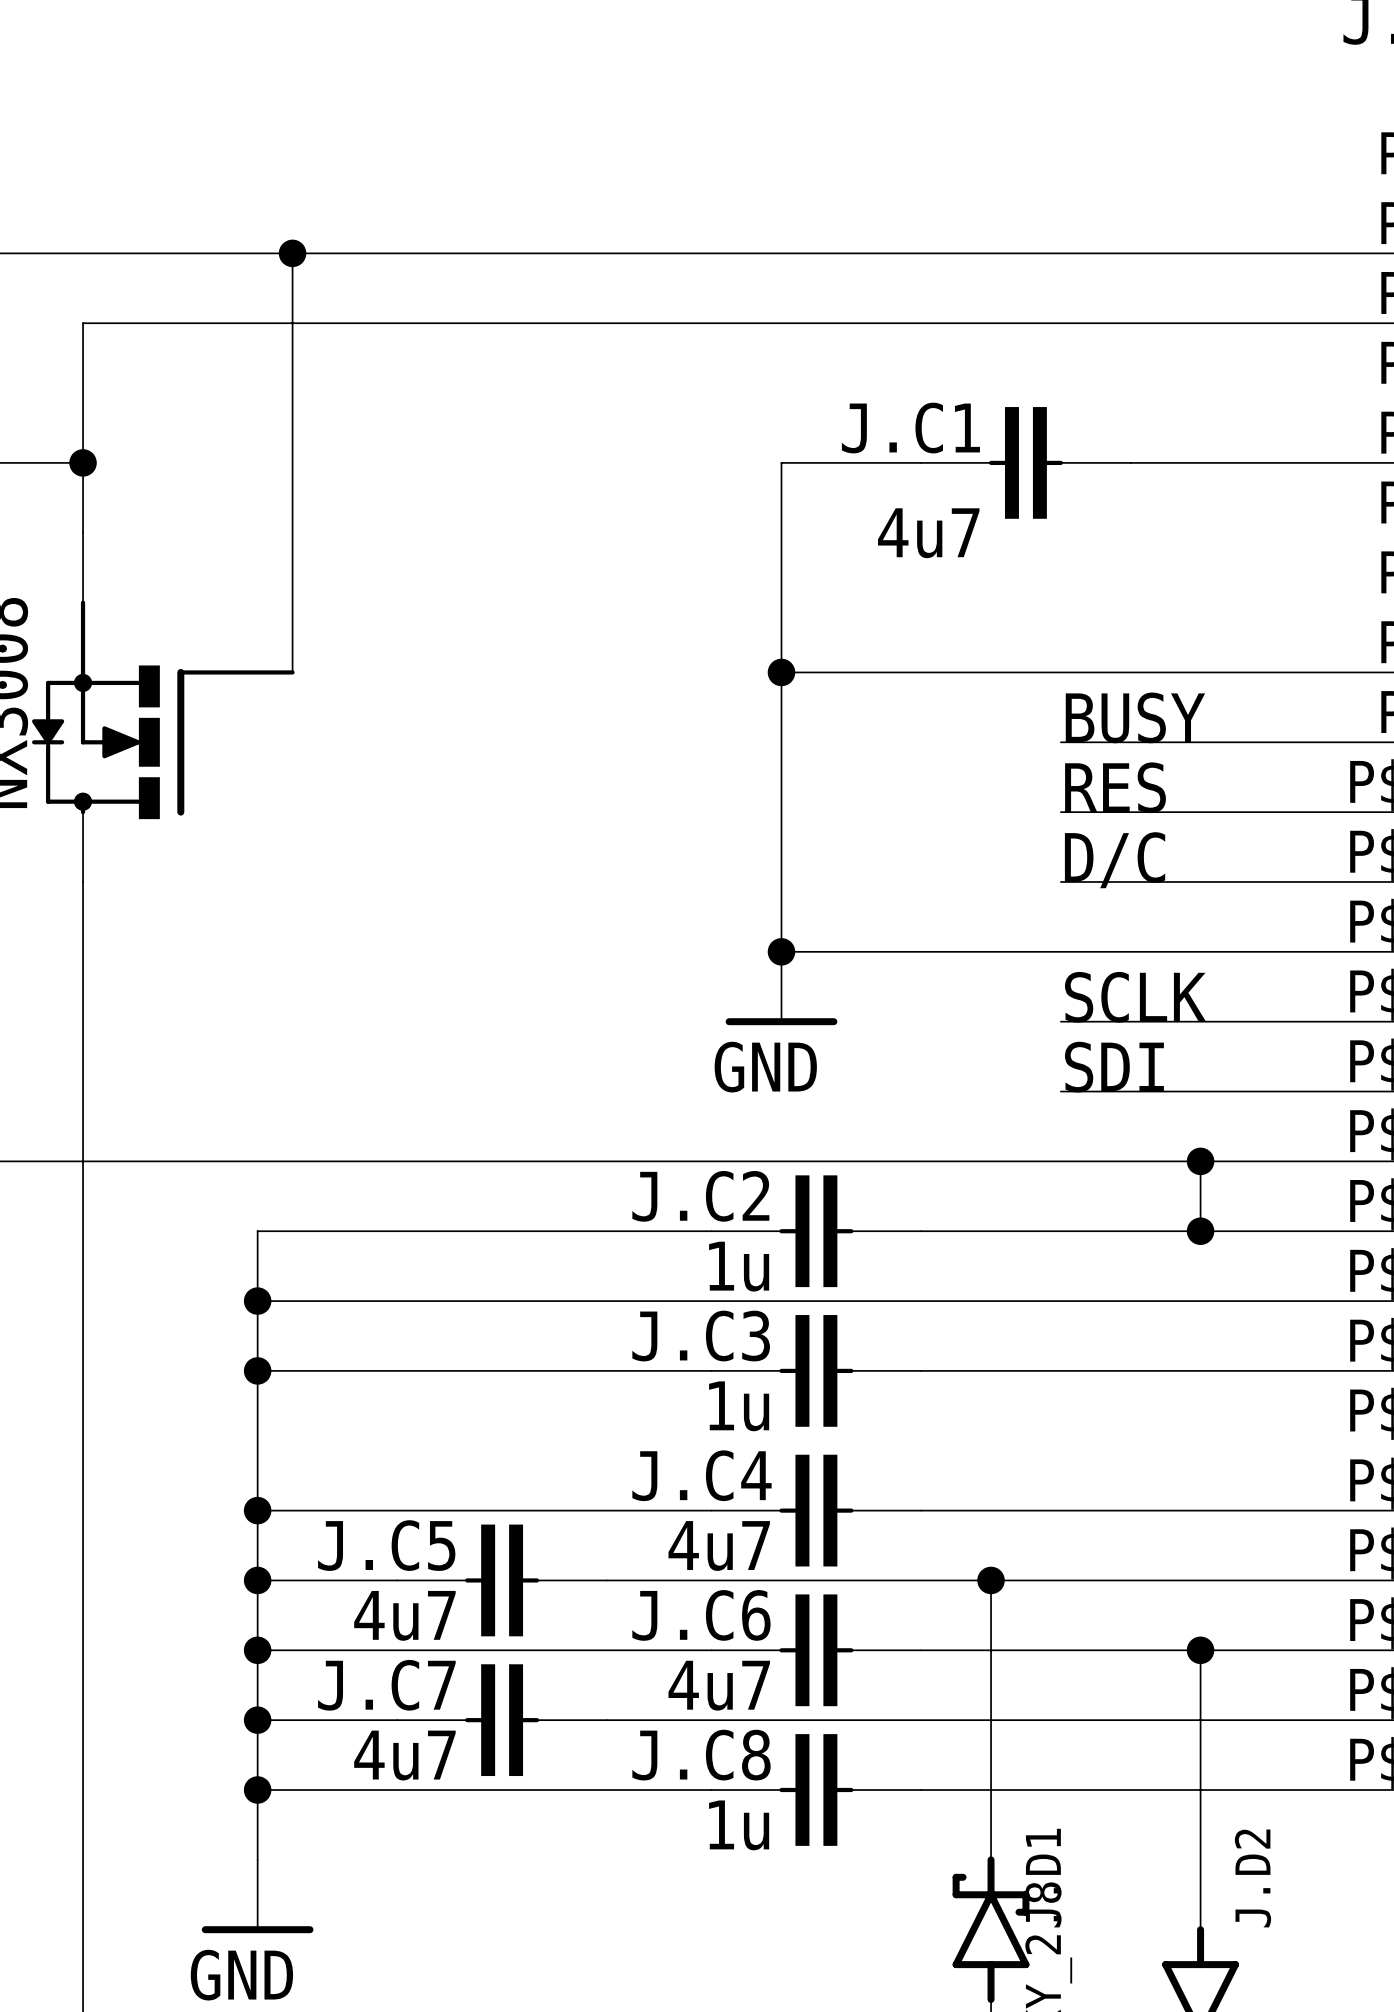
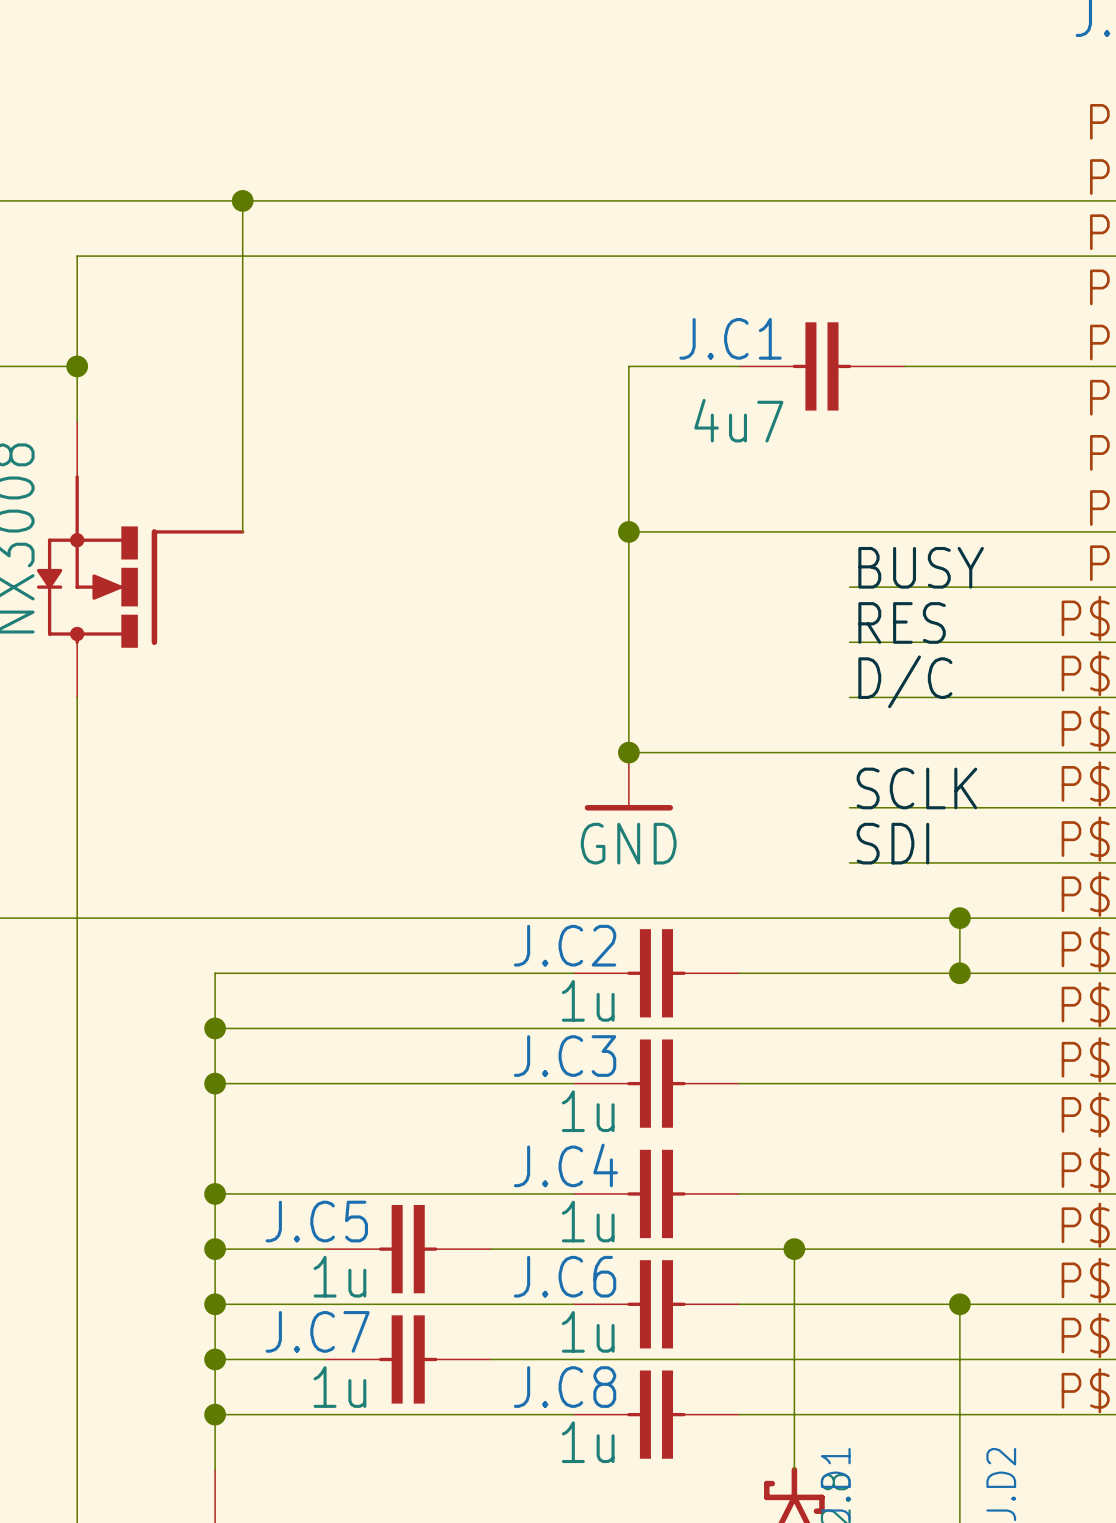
J.C4 value: 4u7 (719, 1546) -> 1u (588, 1221)
J.C5 value: 4u7 (404, 1615) -> 1u (339, 1276)
J.C6 value: 4u7 (719, 1685) -> 1u (588, 1331)
J.C7 value: 4u7 (404, 1755) -> 1u (339, 1387)

